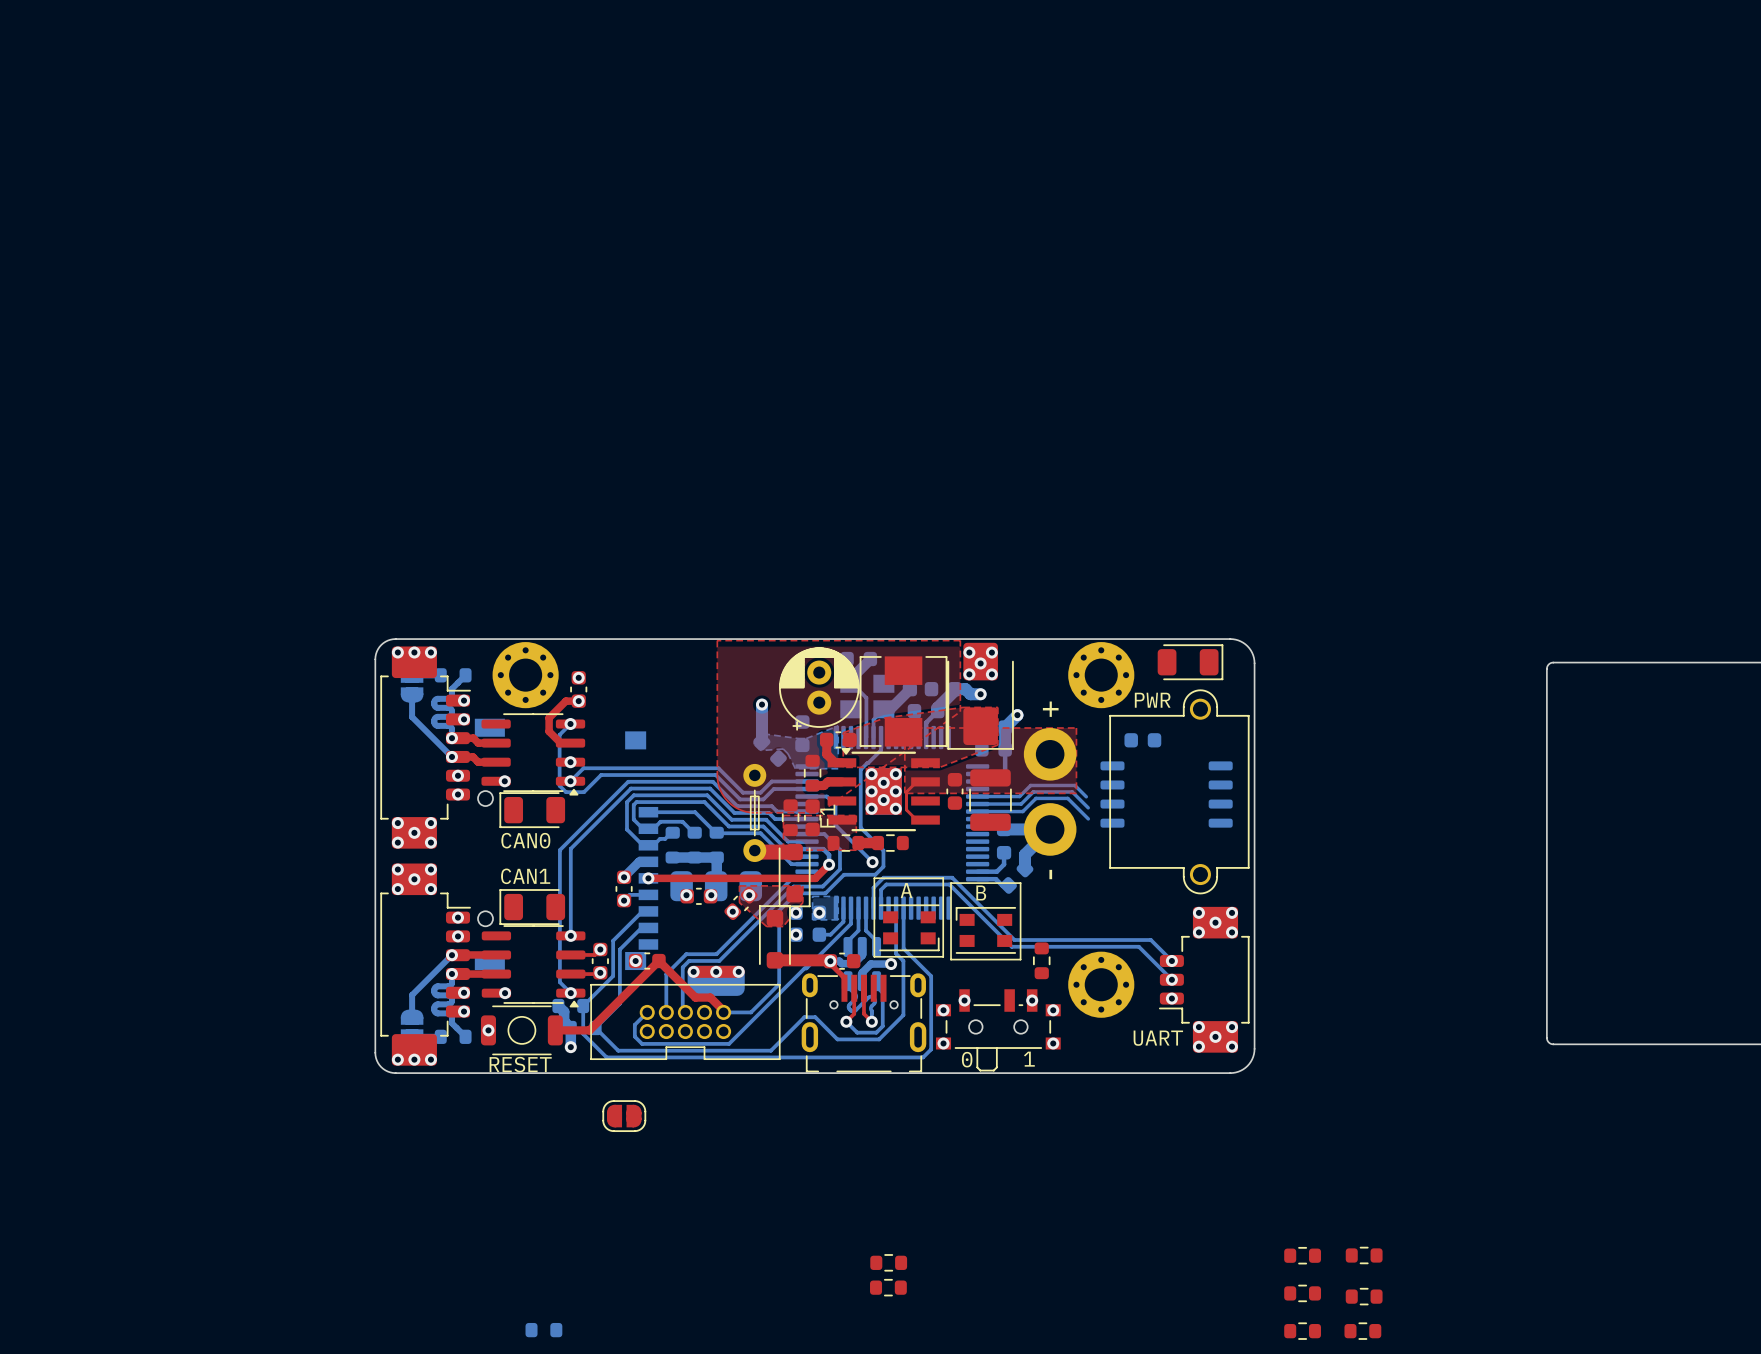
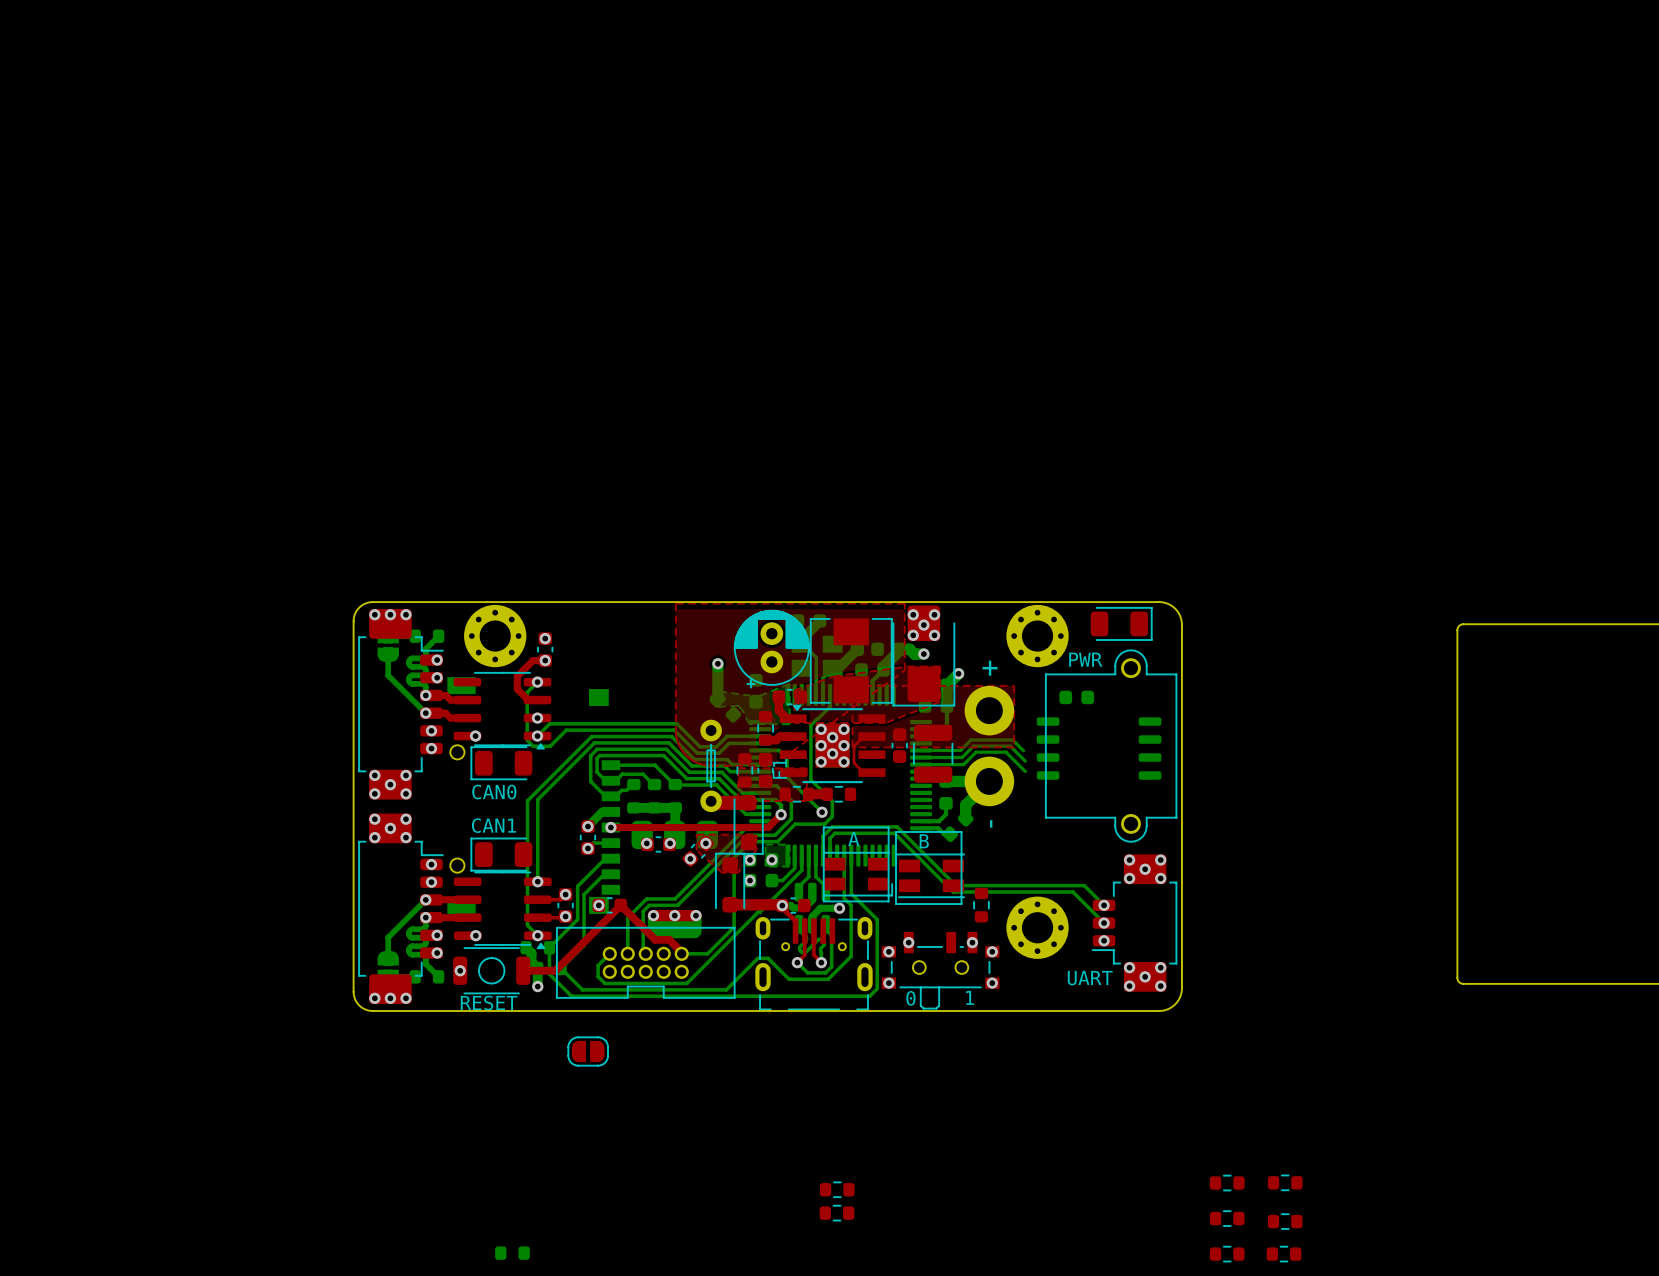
part footprint: [879, 904, 940, 952] -> [823, 851, 894, 897]
part footprint: [955, 906, 1017, 954] -> [895, 853, 965, 899]

